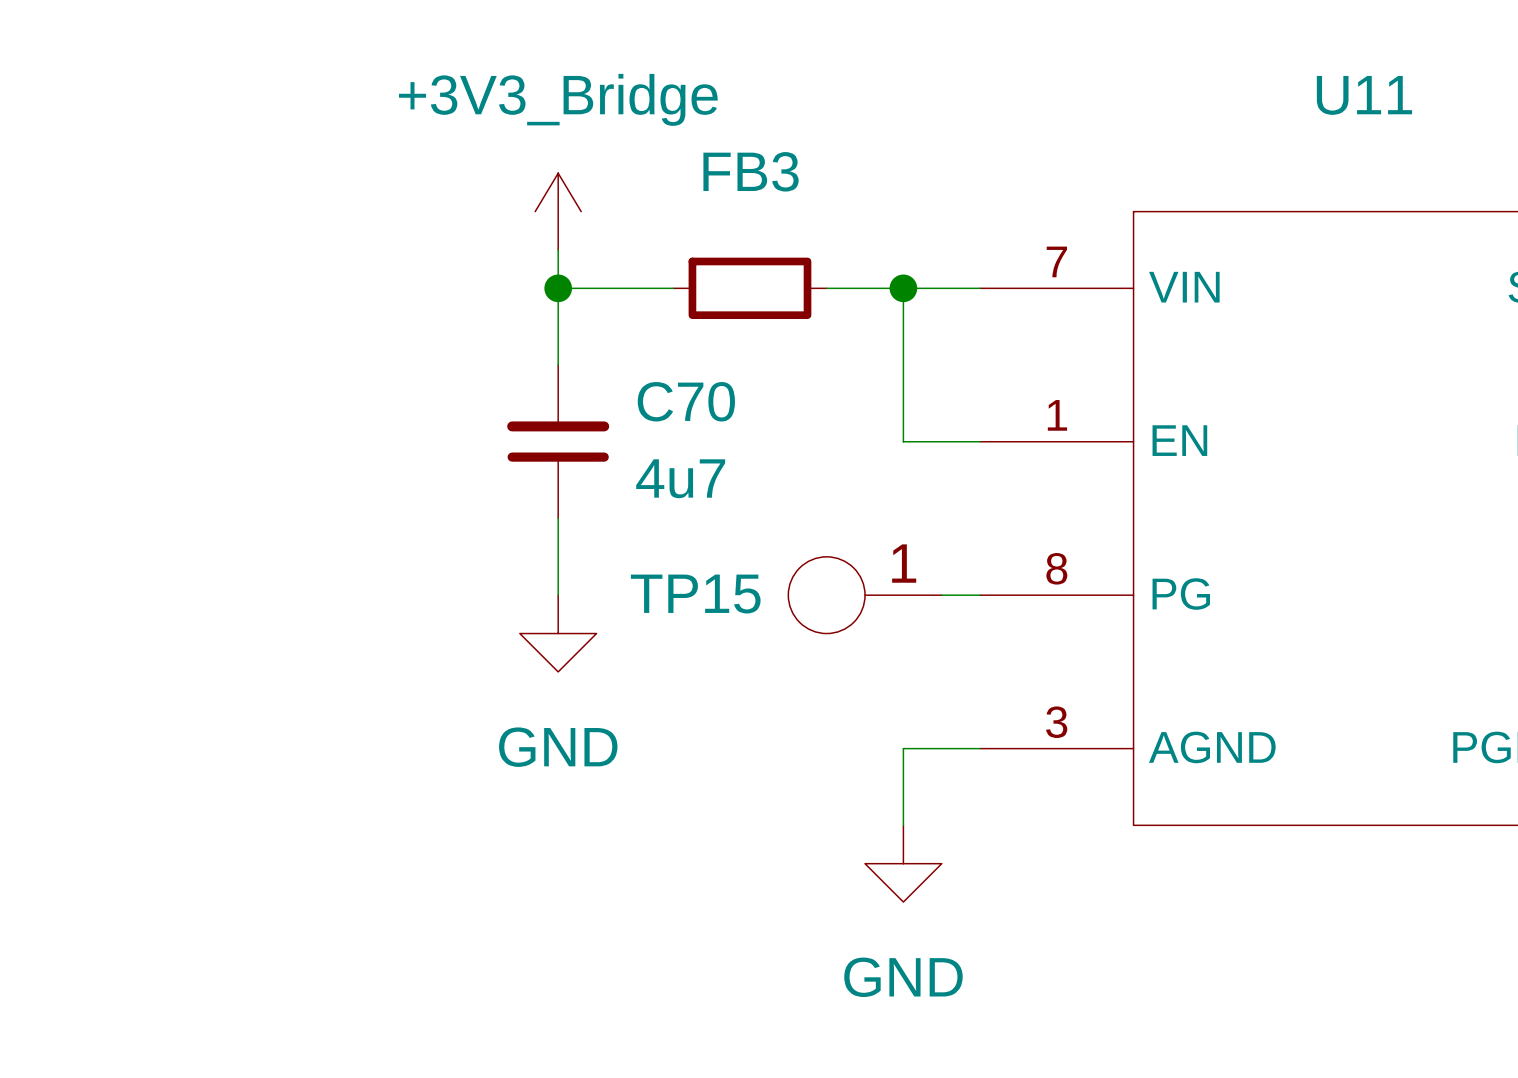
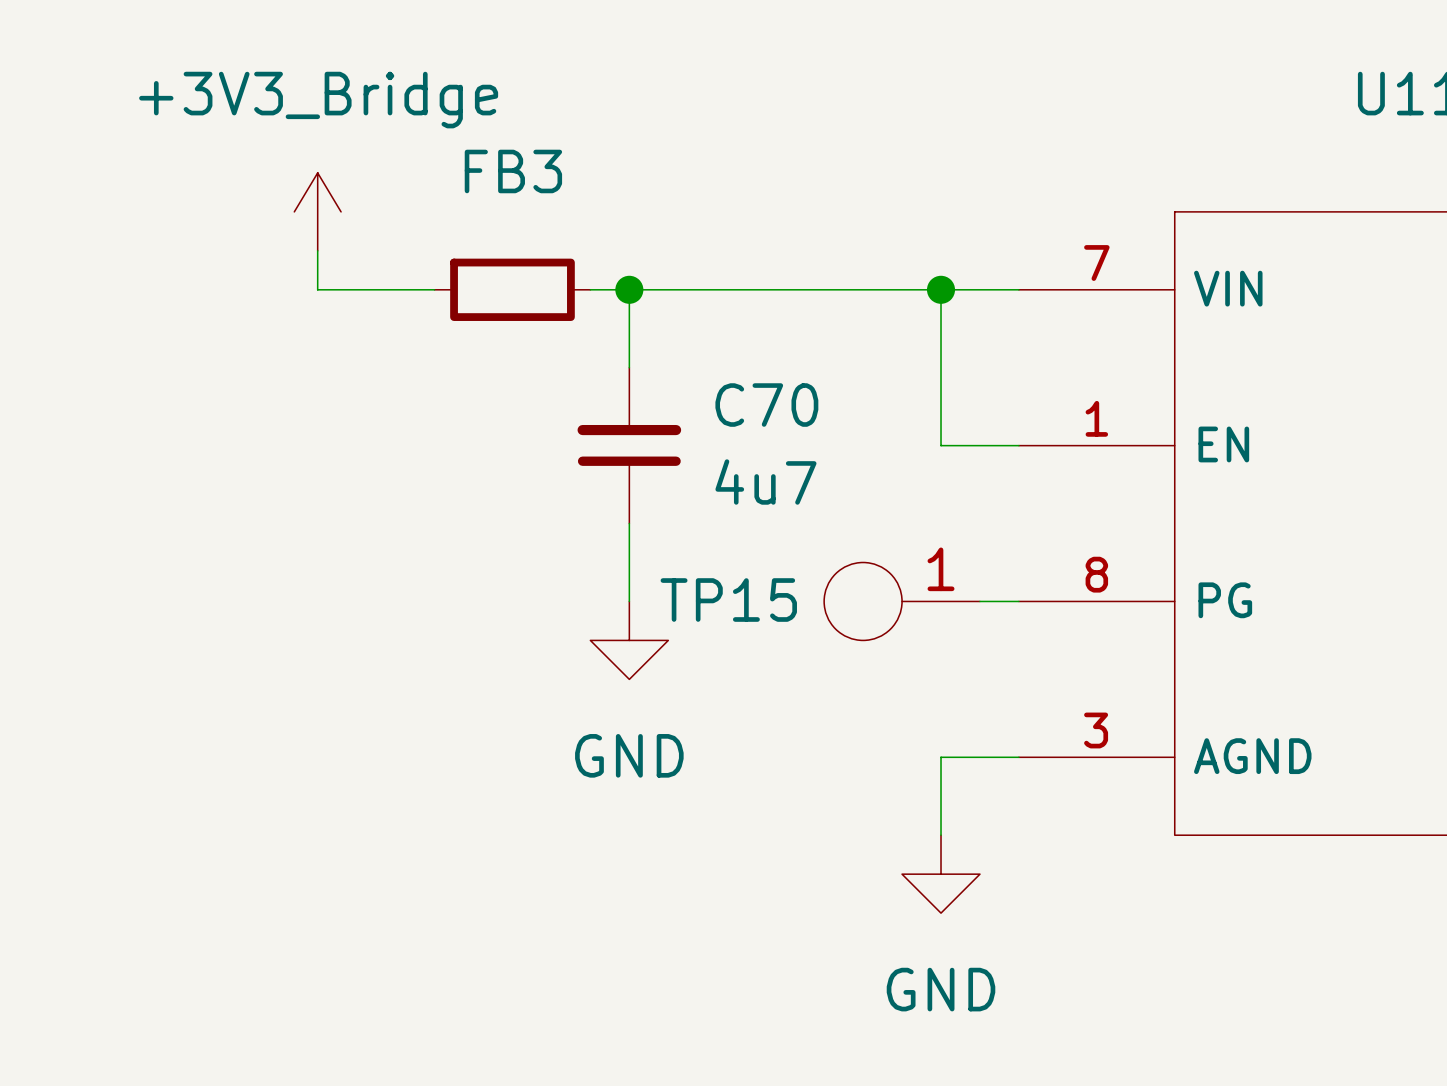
power symbol position: +3V3_Bridge (558, 211) -> +3V3_Bridge (317, 211)
wire: none -> (317, 250) (317, 289) (434, 289)
wire: (558, 249) (558, 365) -> none
junction position: (558, 288) -> (629, 289)
wire: none -> (629, 289) (629, 367)
wire: none -> (707, 289) (863, 289)
FB3 position: (749, 288) -> (512, 289)
C70 position: (558, 441) -> (629, 445)
wire: (558, 518) (558, 595) -> (629, 523) (629, 601)
power symbol position: GND (558, 633) -> GND (629, 640)

